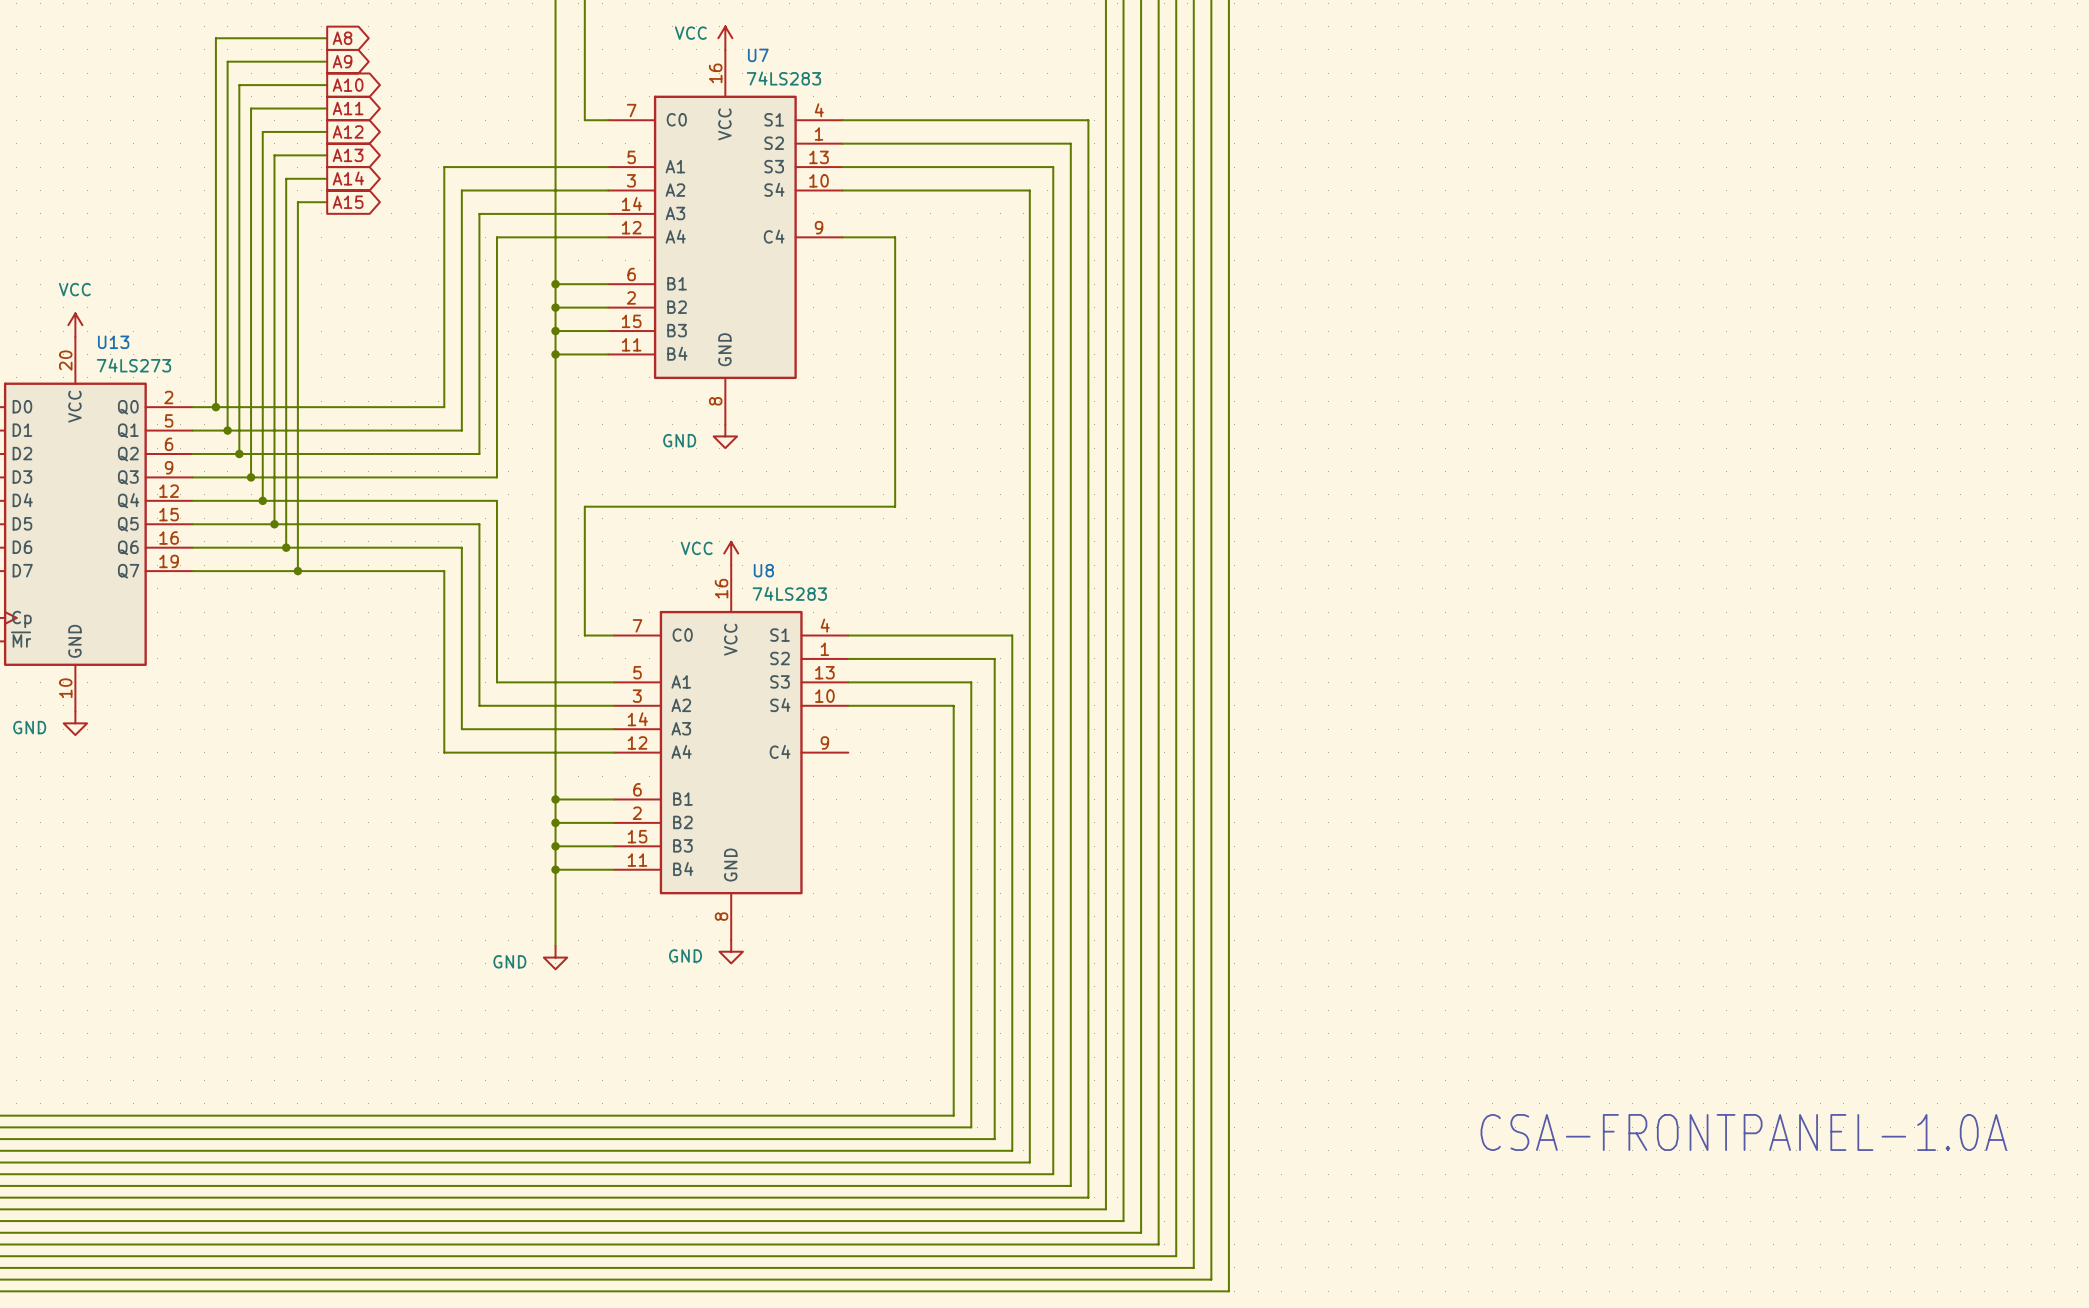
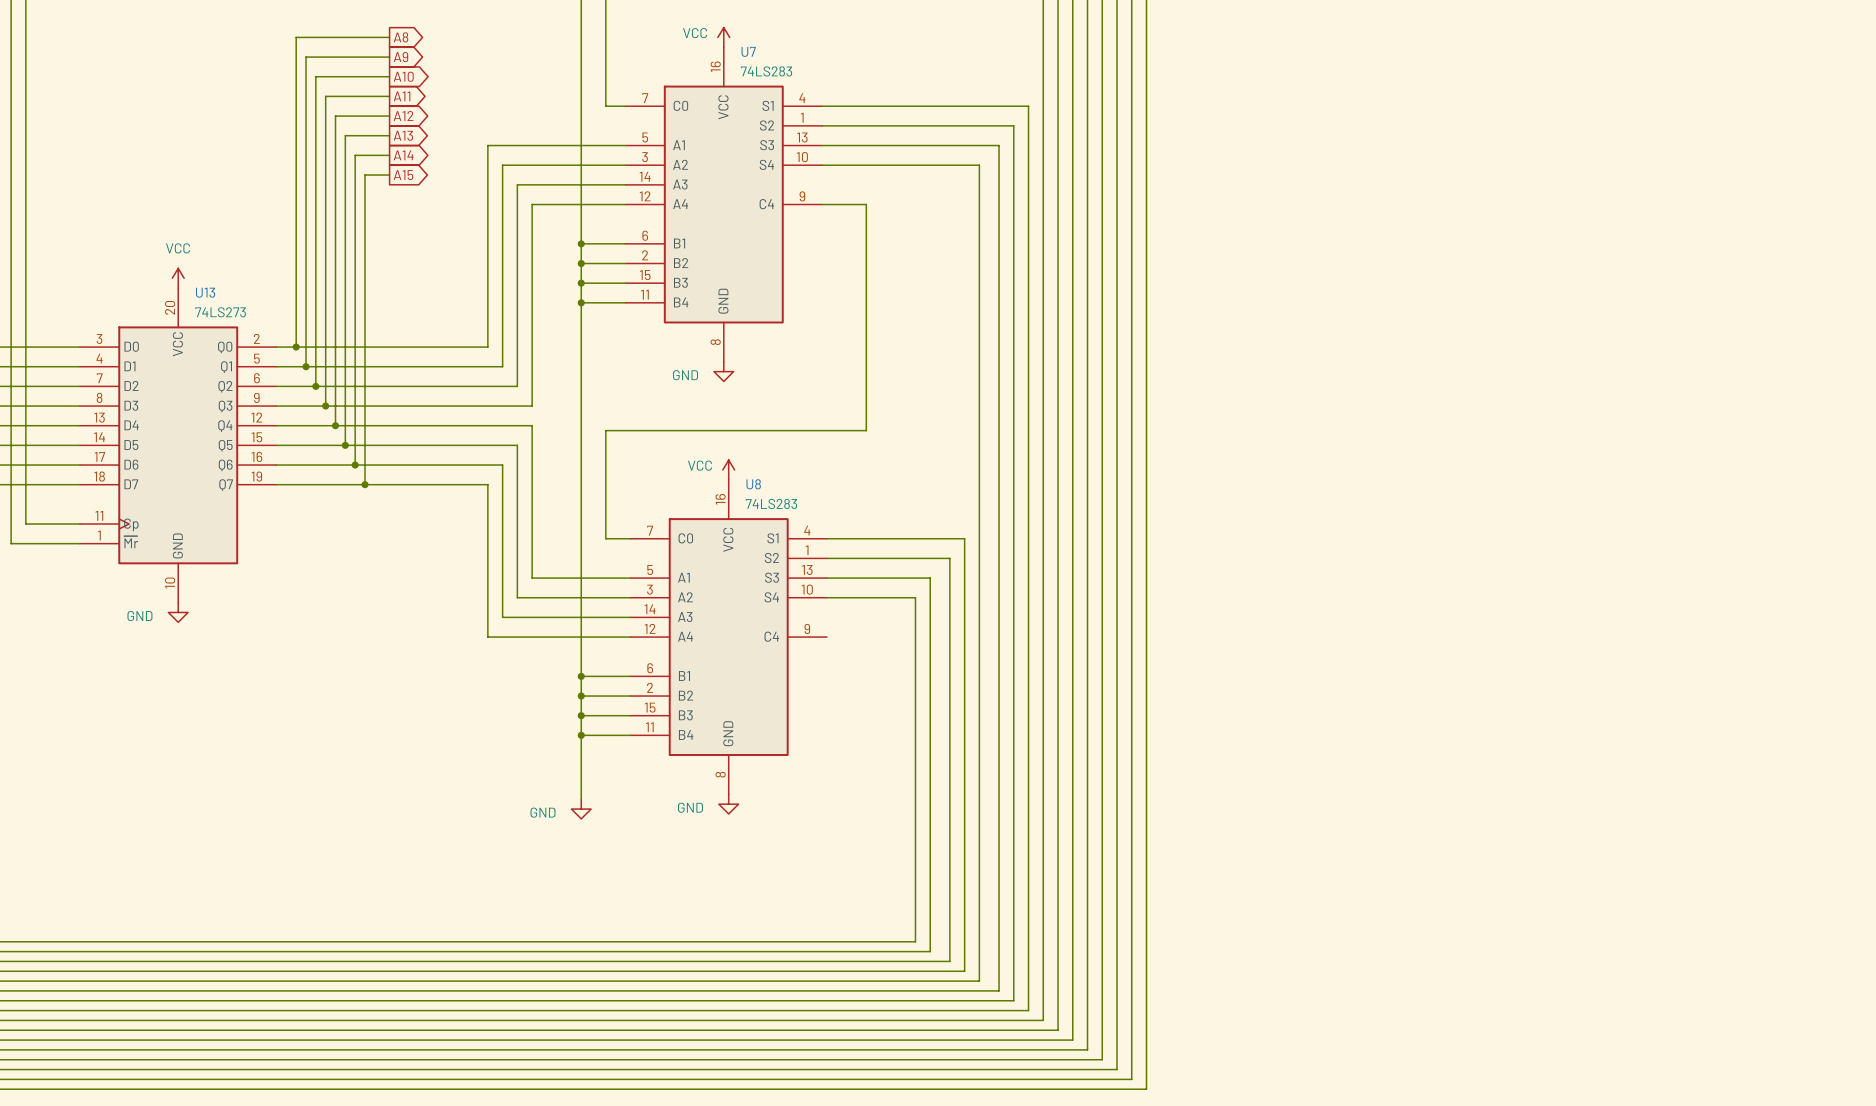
text: CSA-FRONTPANEL-1.0A (1743, 1132) -> none

